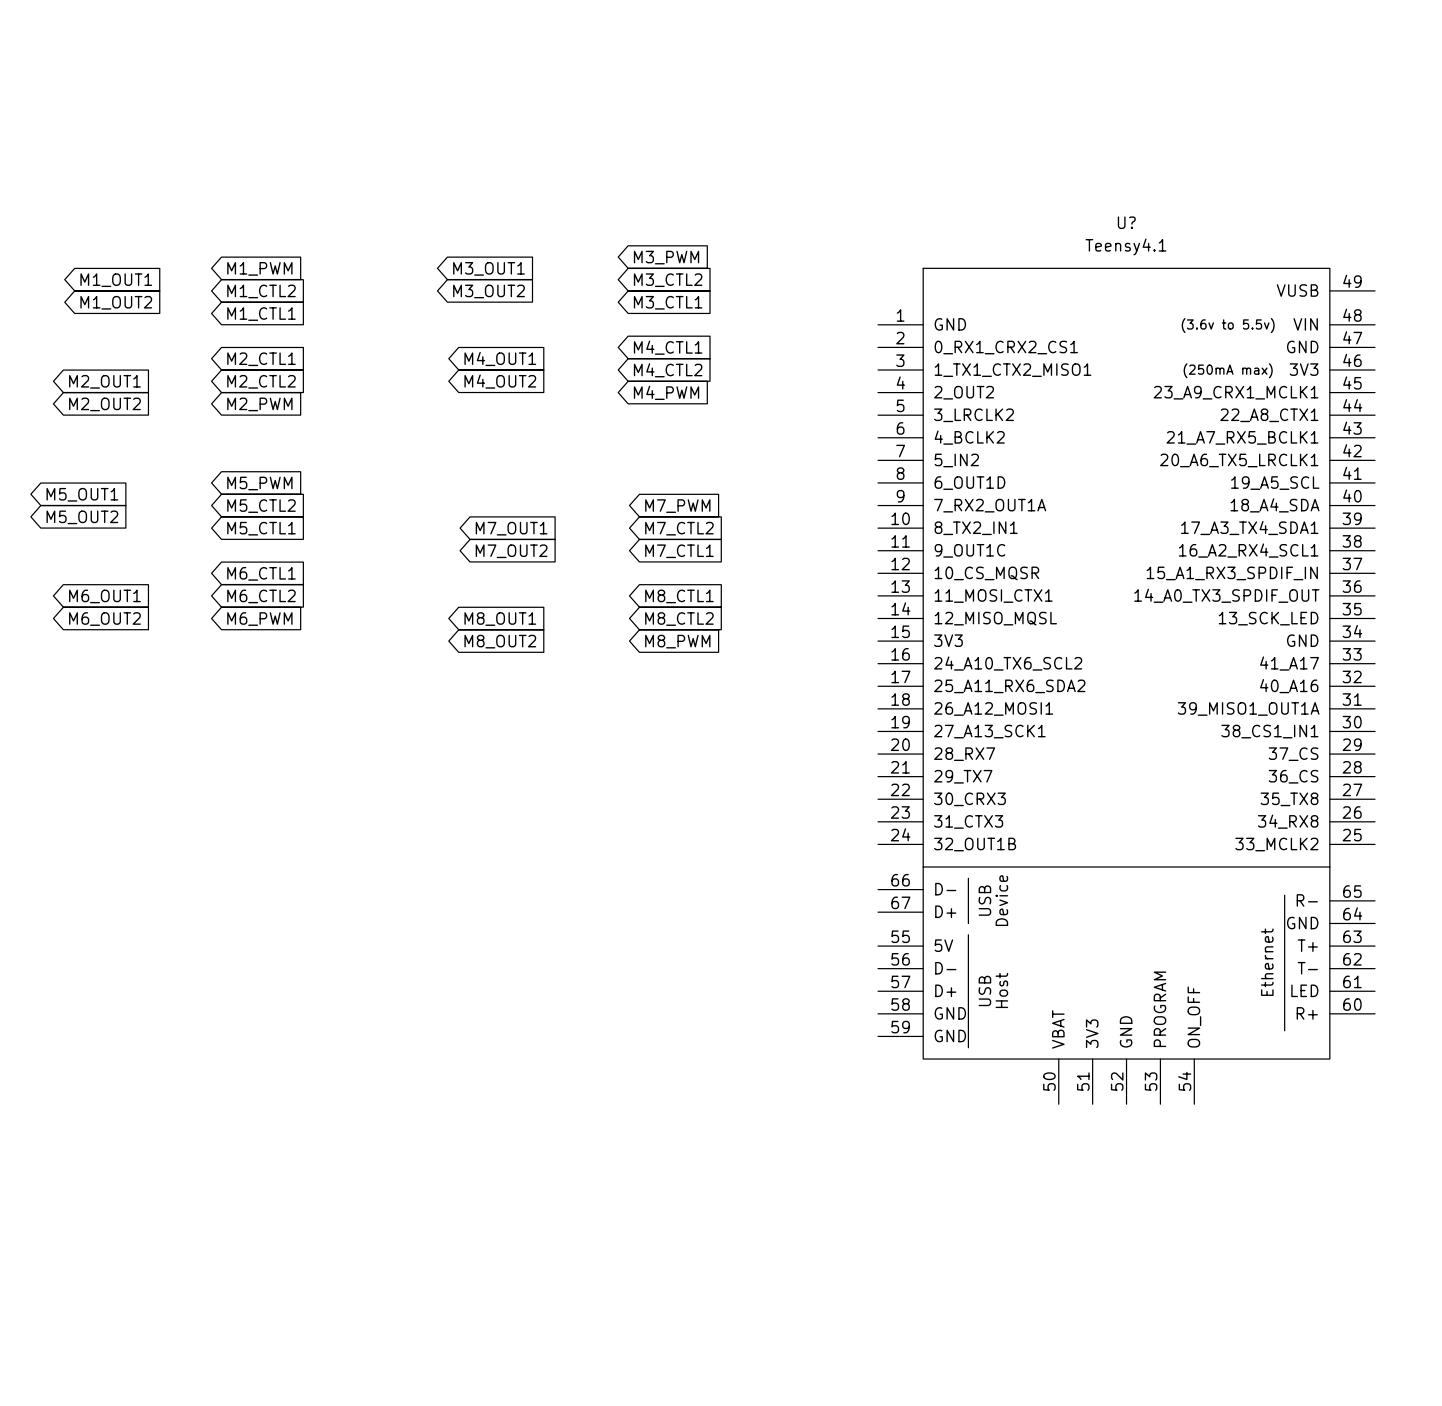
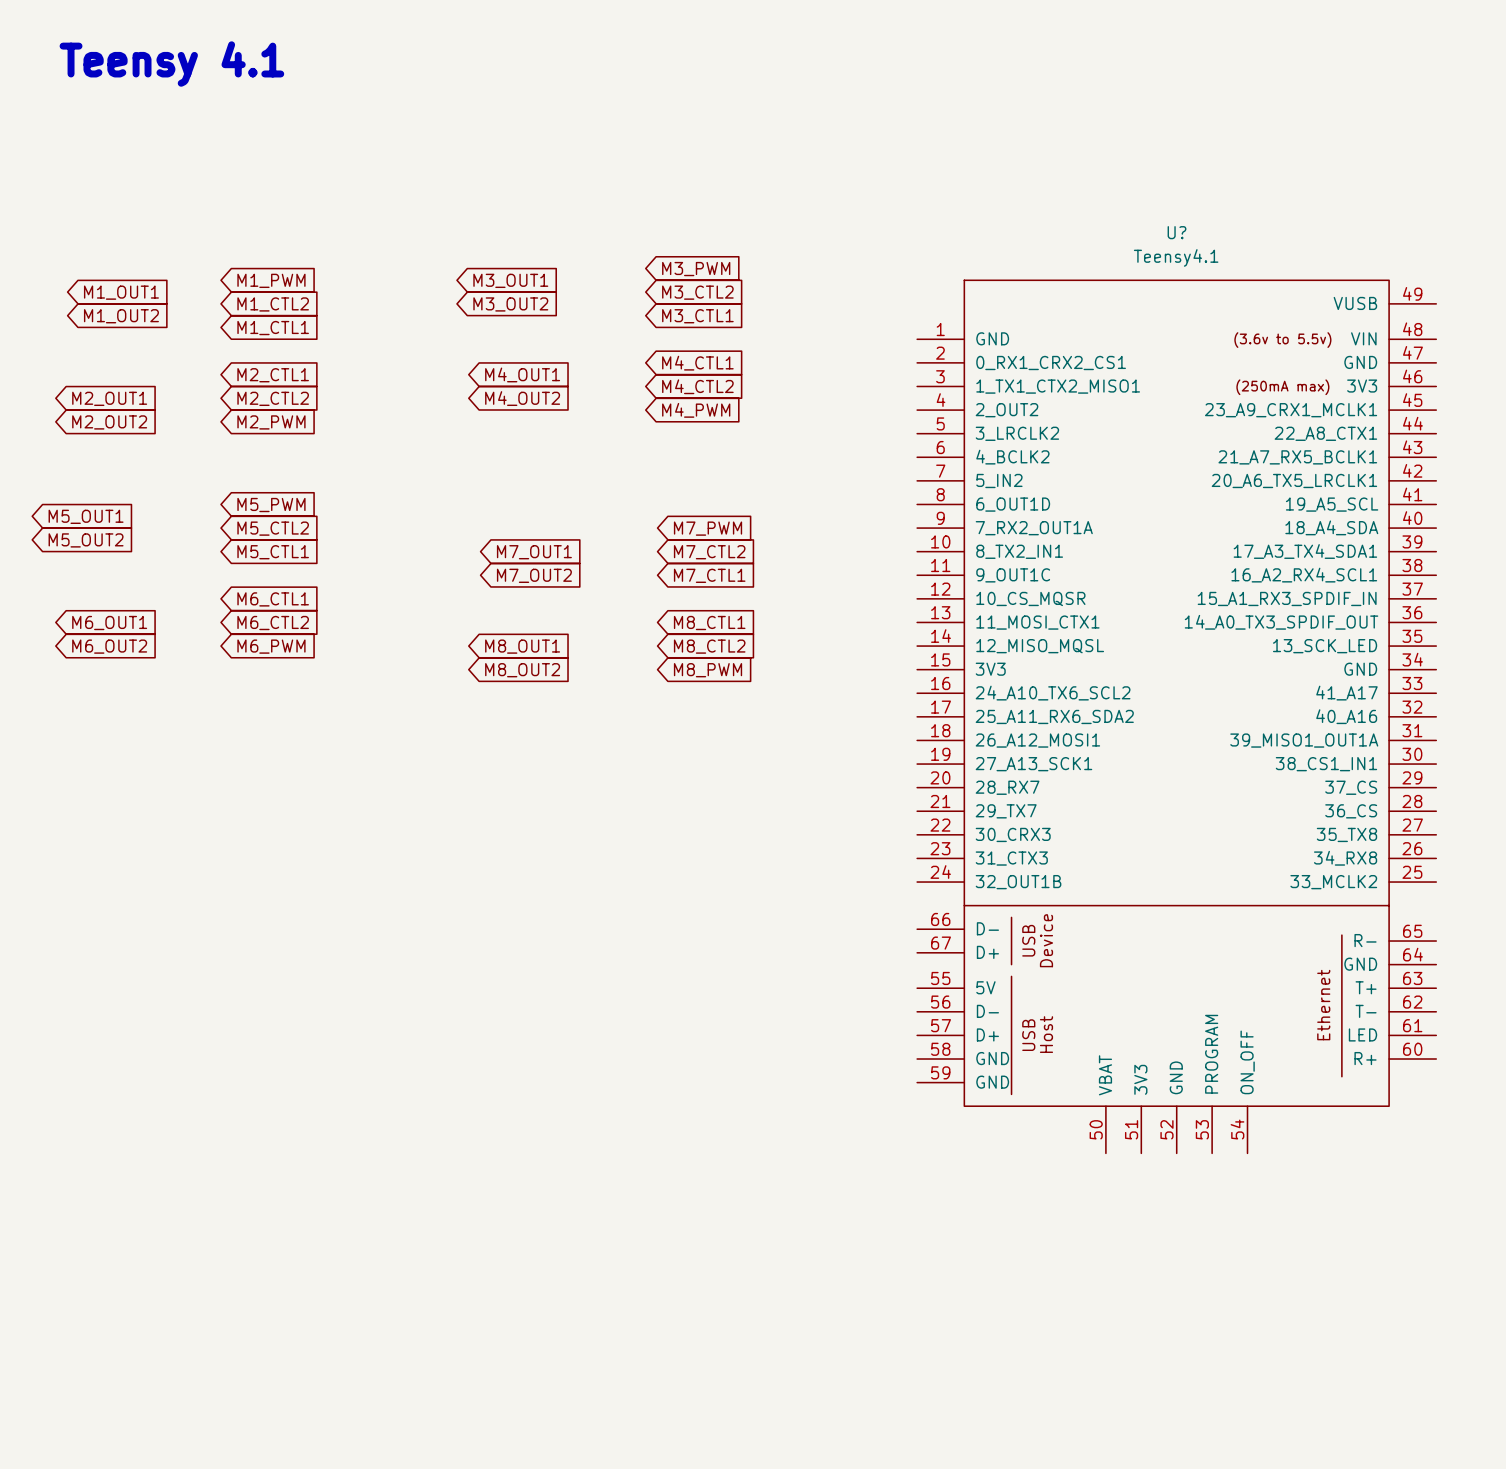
text: none -> Teensy 4.1 (171, 64)

